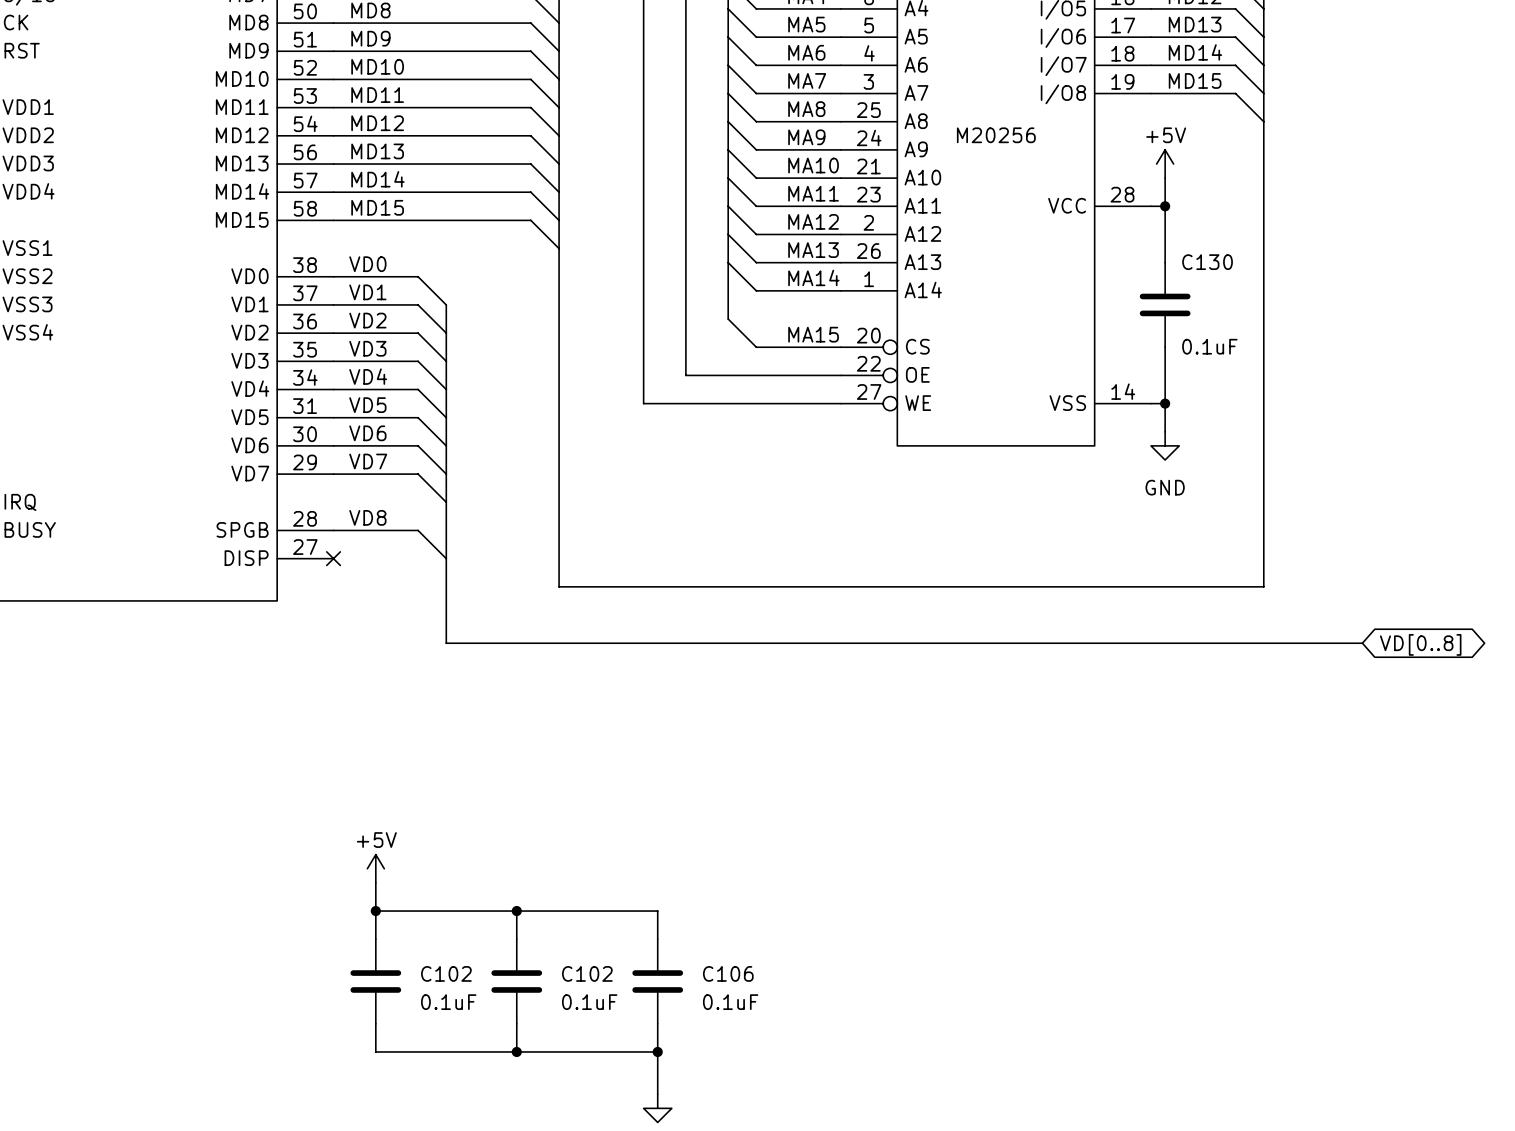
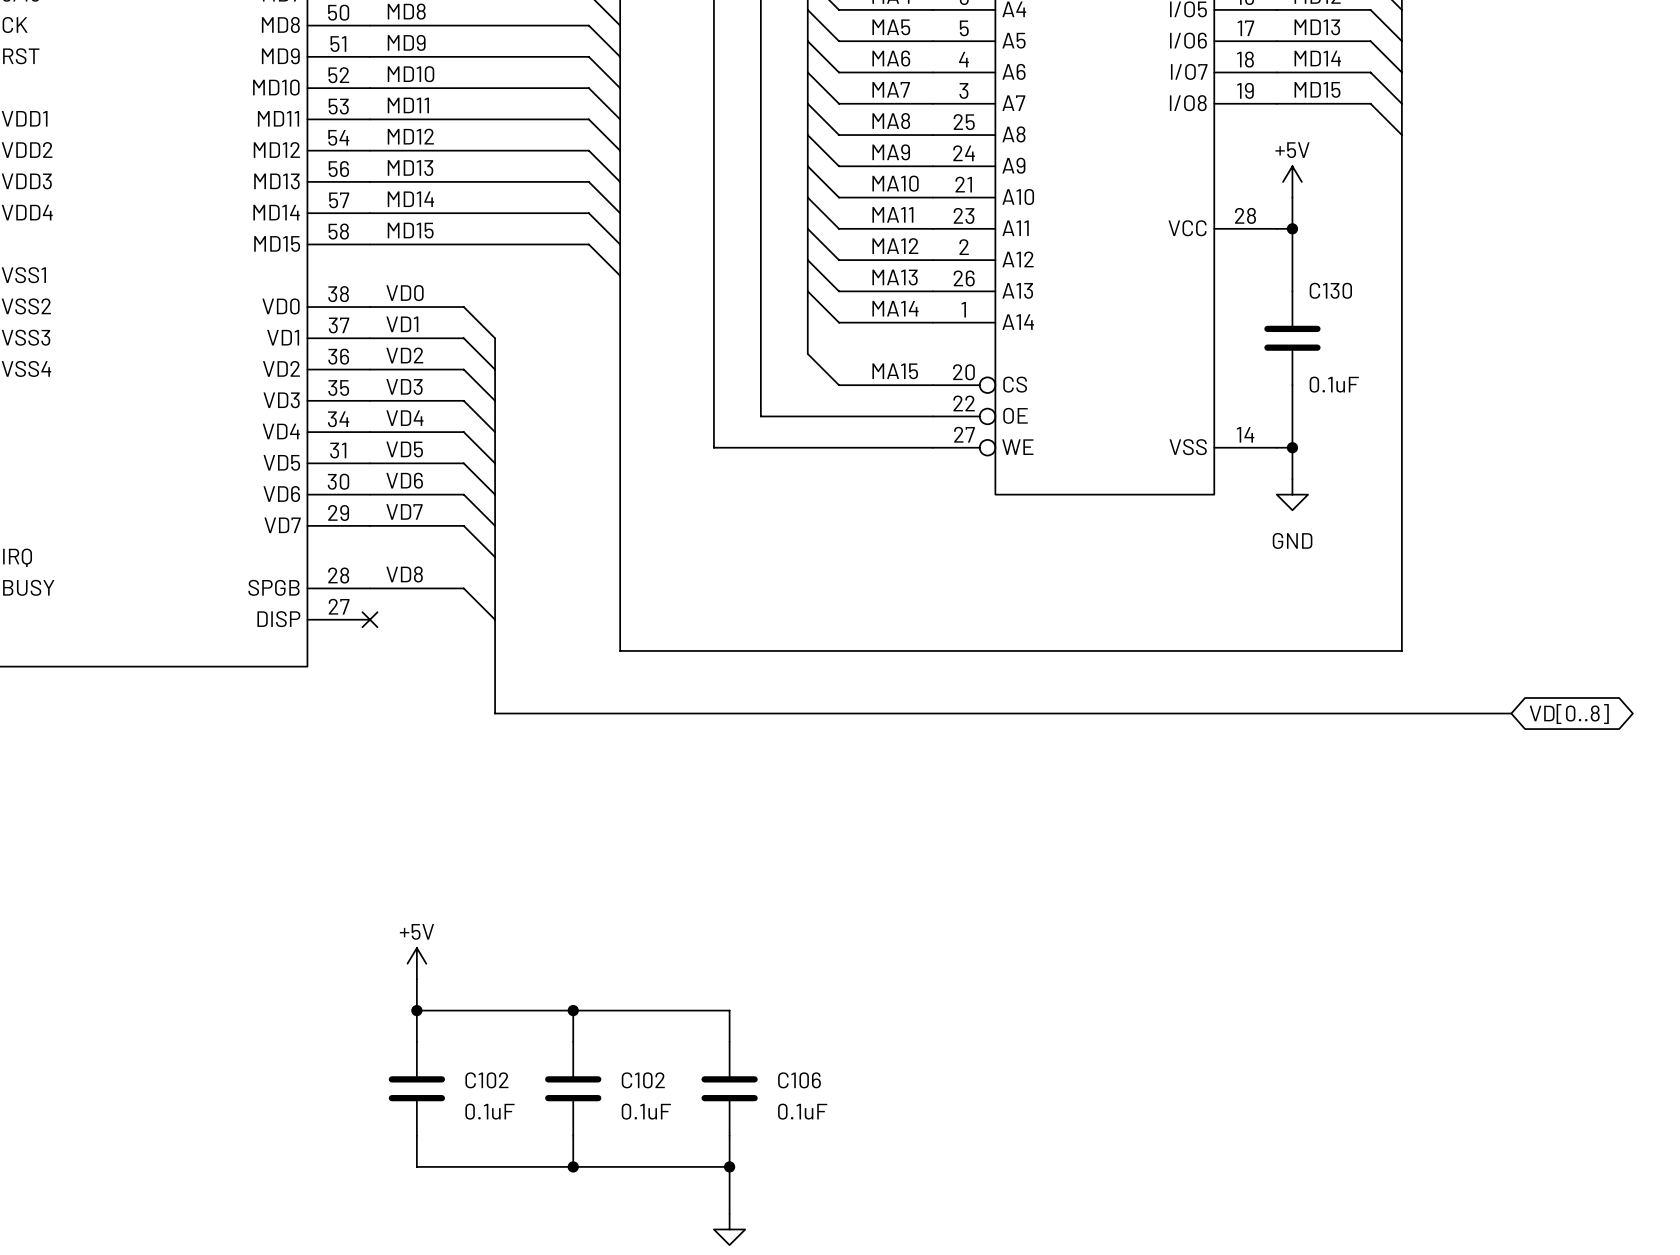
part value: M20256 (996, 135) -> none

